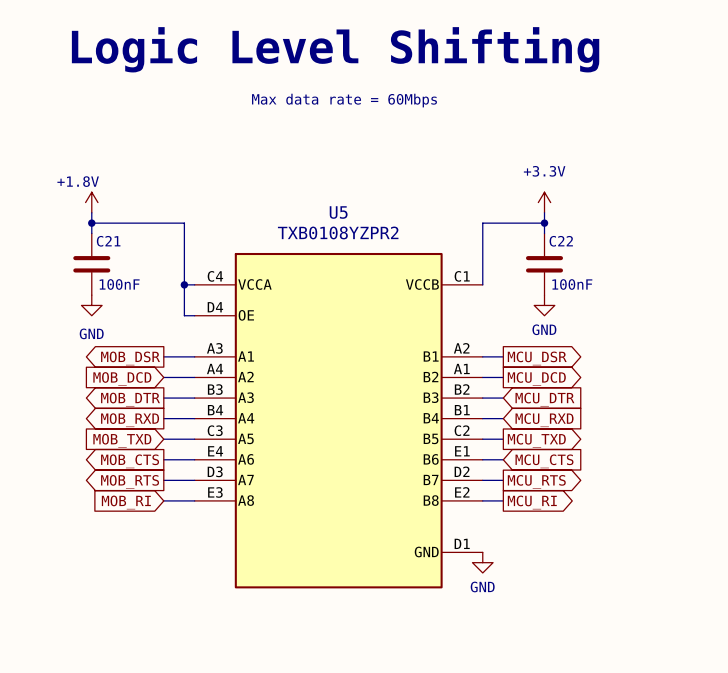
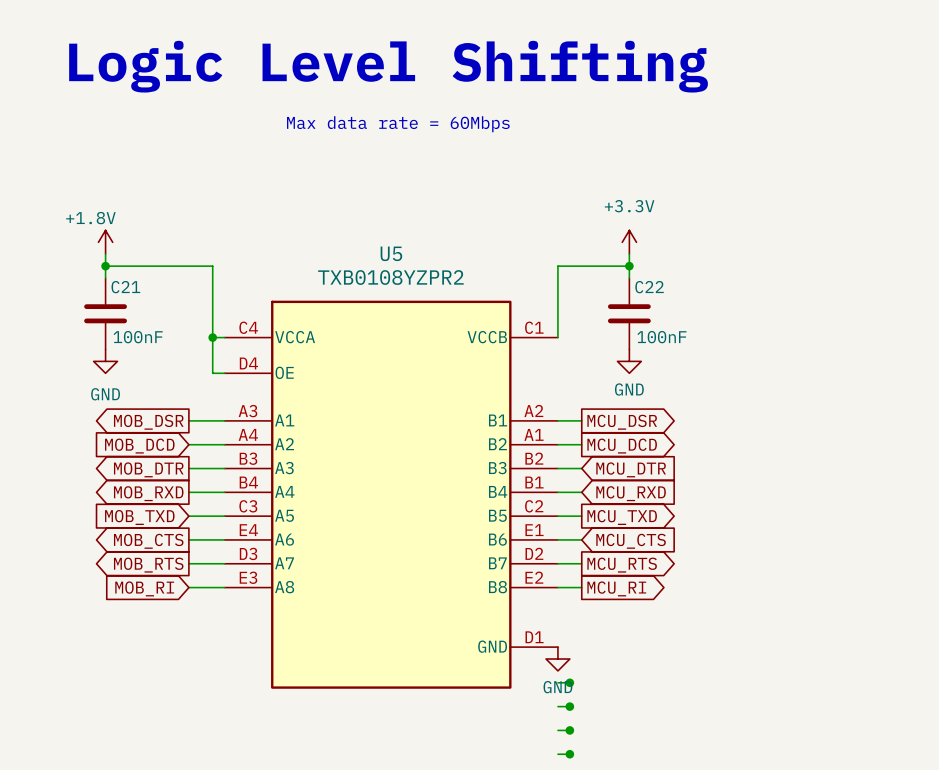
wire: none -> (557, 682) (569, 682)
junction: none -> (569, 682)
wire: none -> (557, 706) (569, 706)
junction: none -> (569, 706)
wire: none -> (557, 730) (569, 730)
junction: none -> (569, 730)
wire: none -> (557, 754) (569, 754)
junction: none -> (569, 754)

